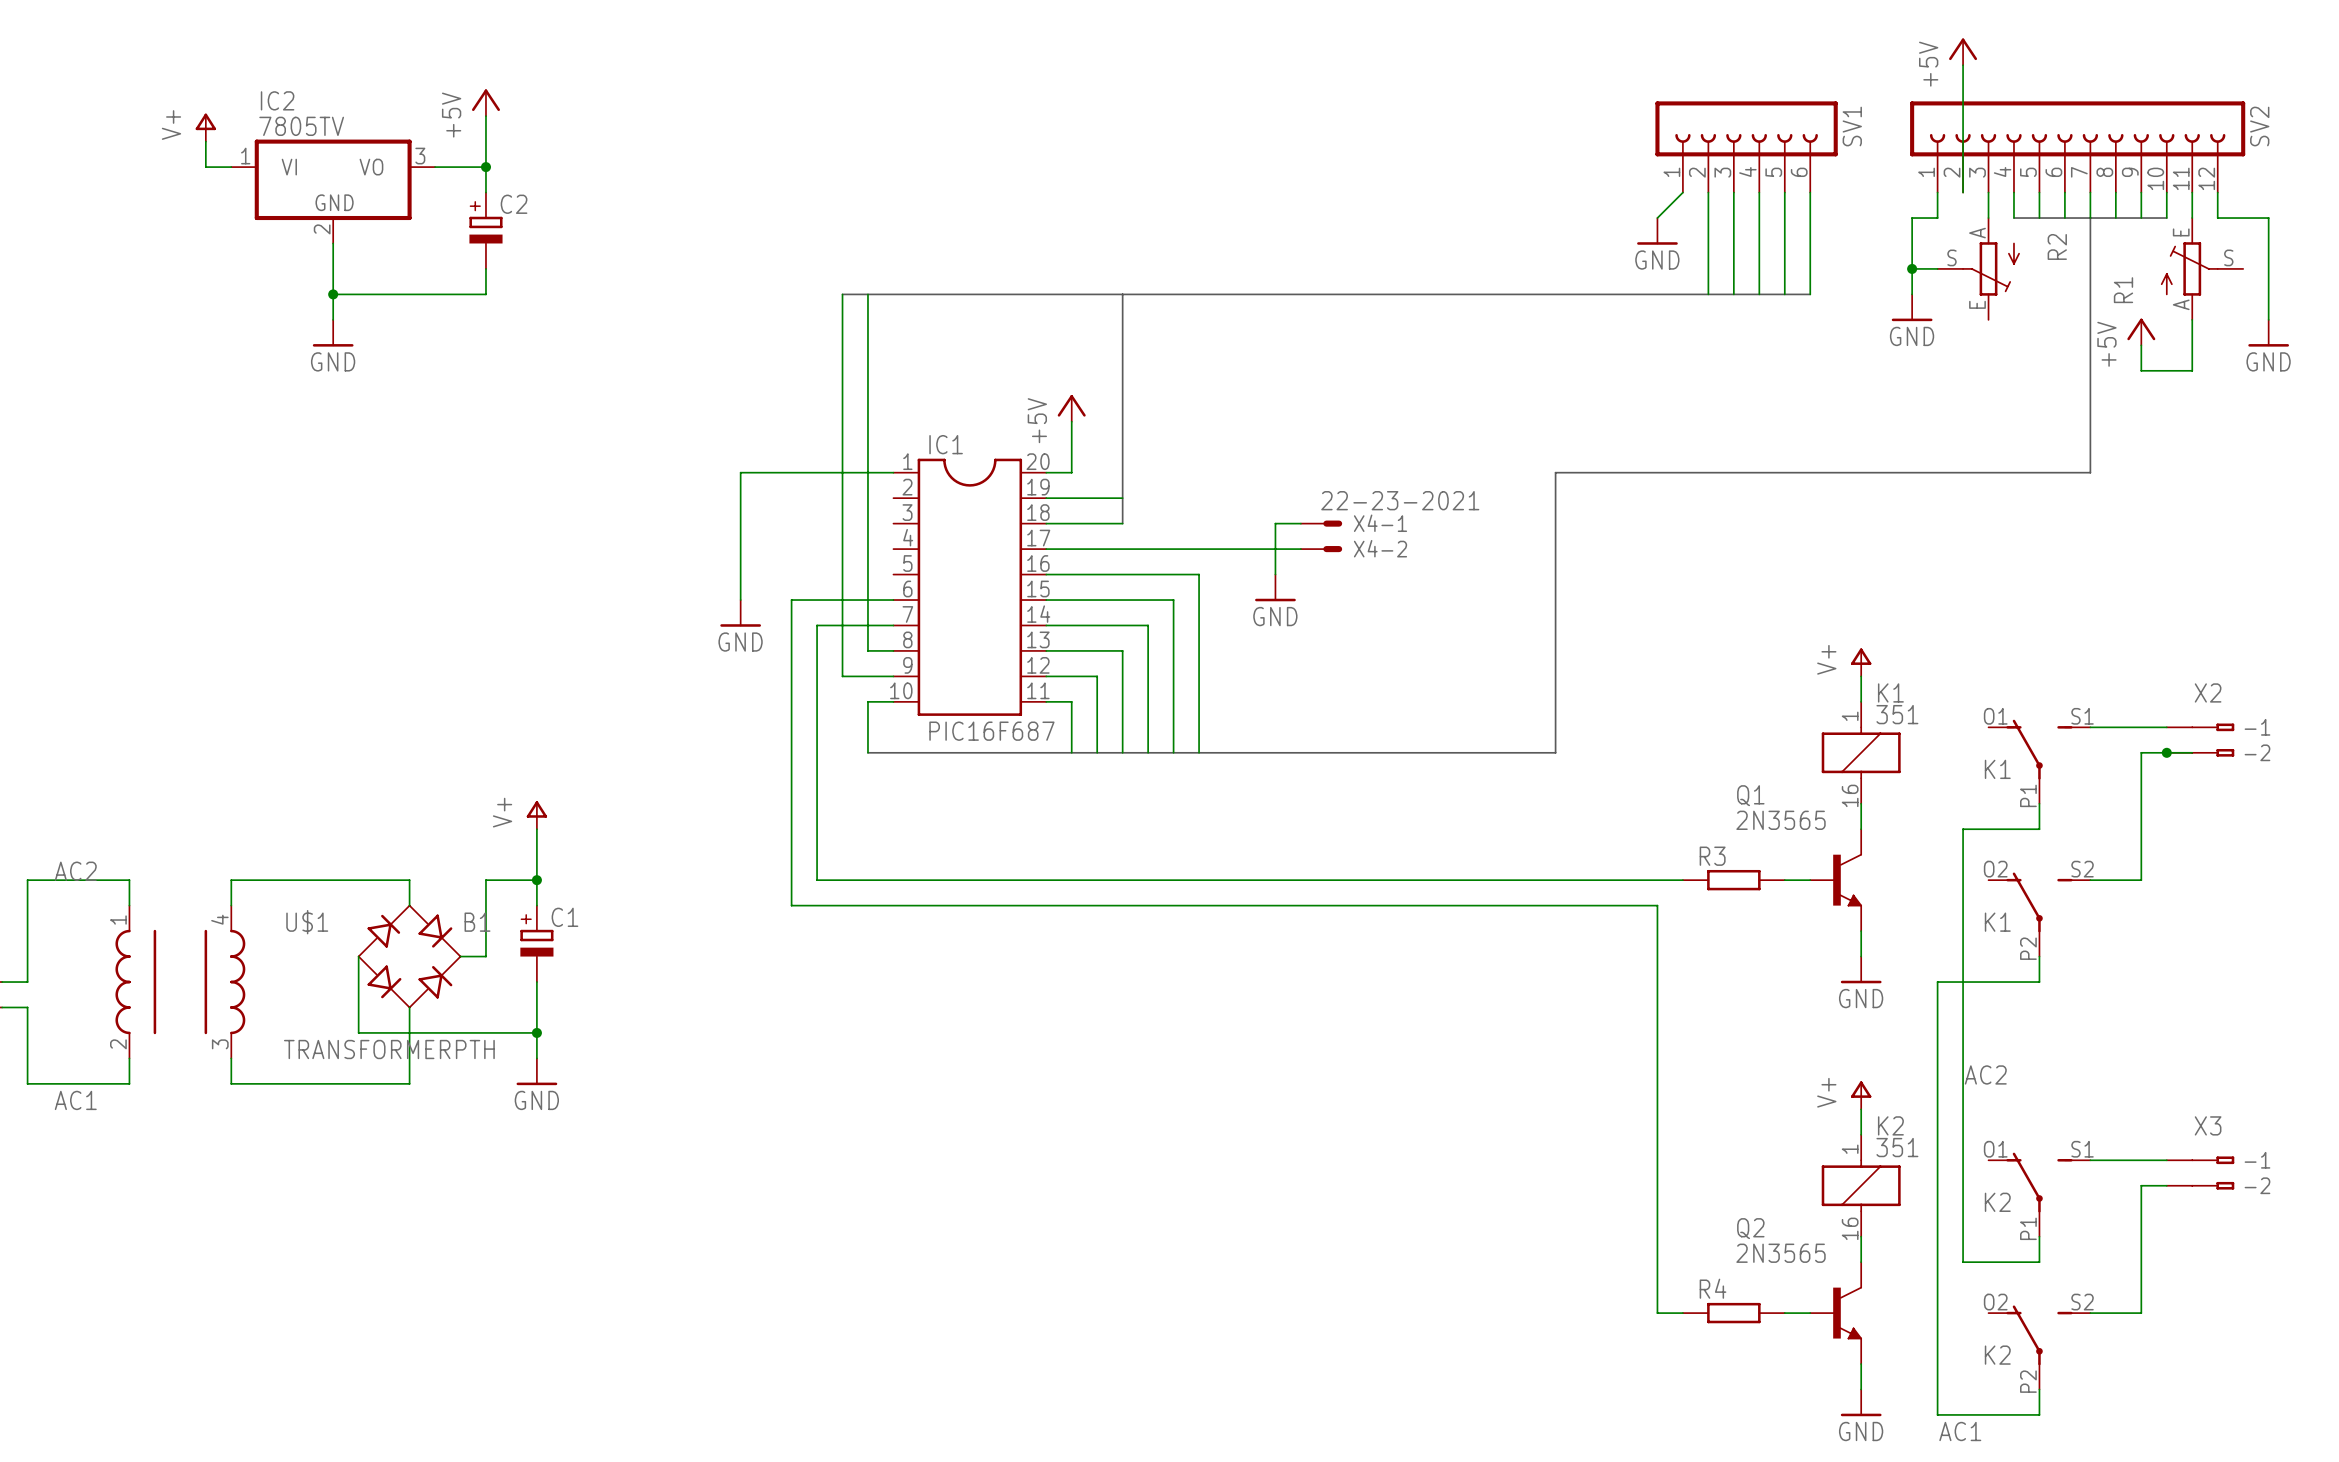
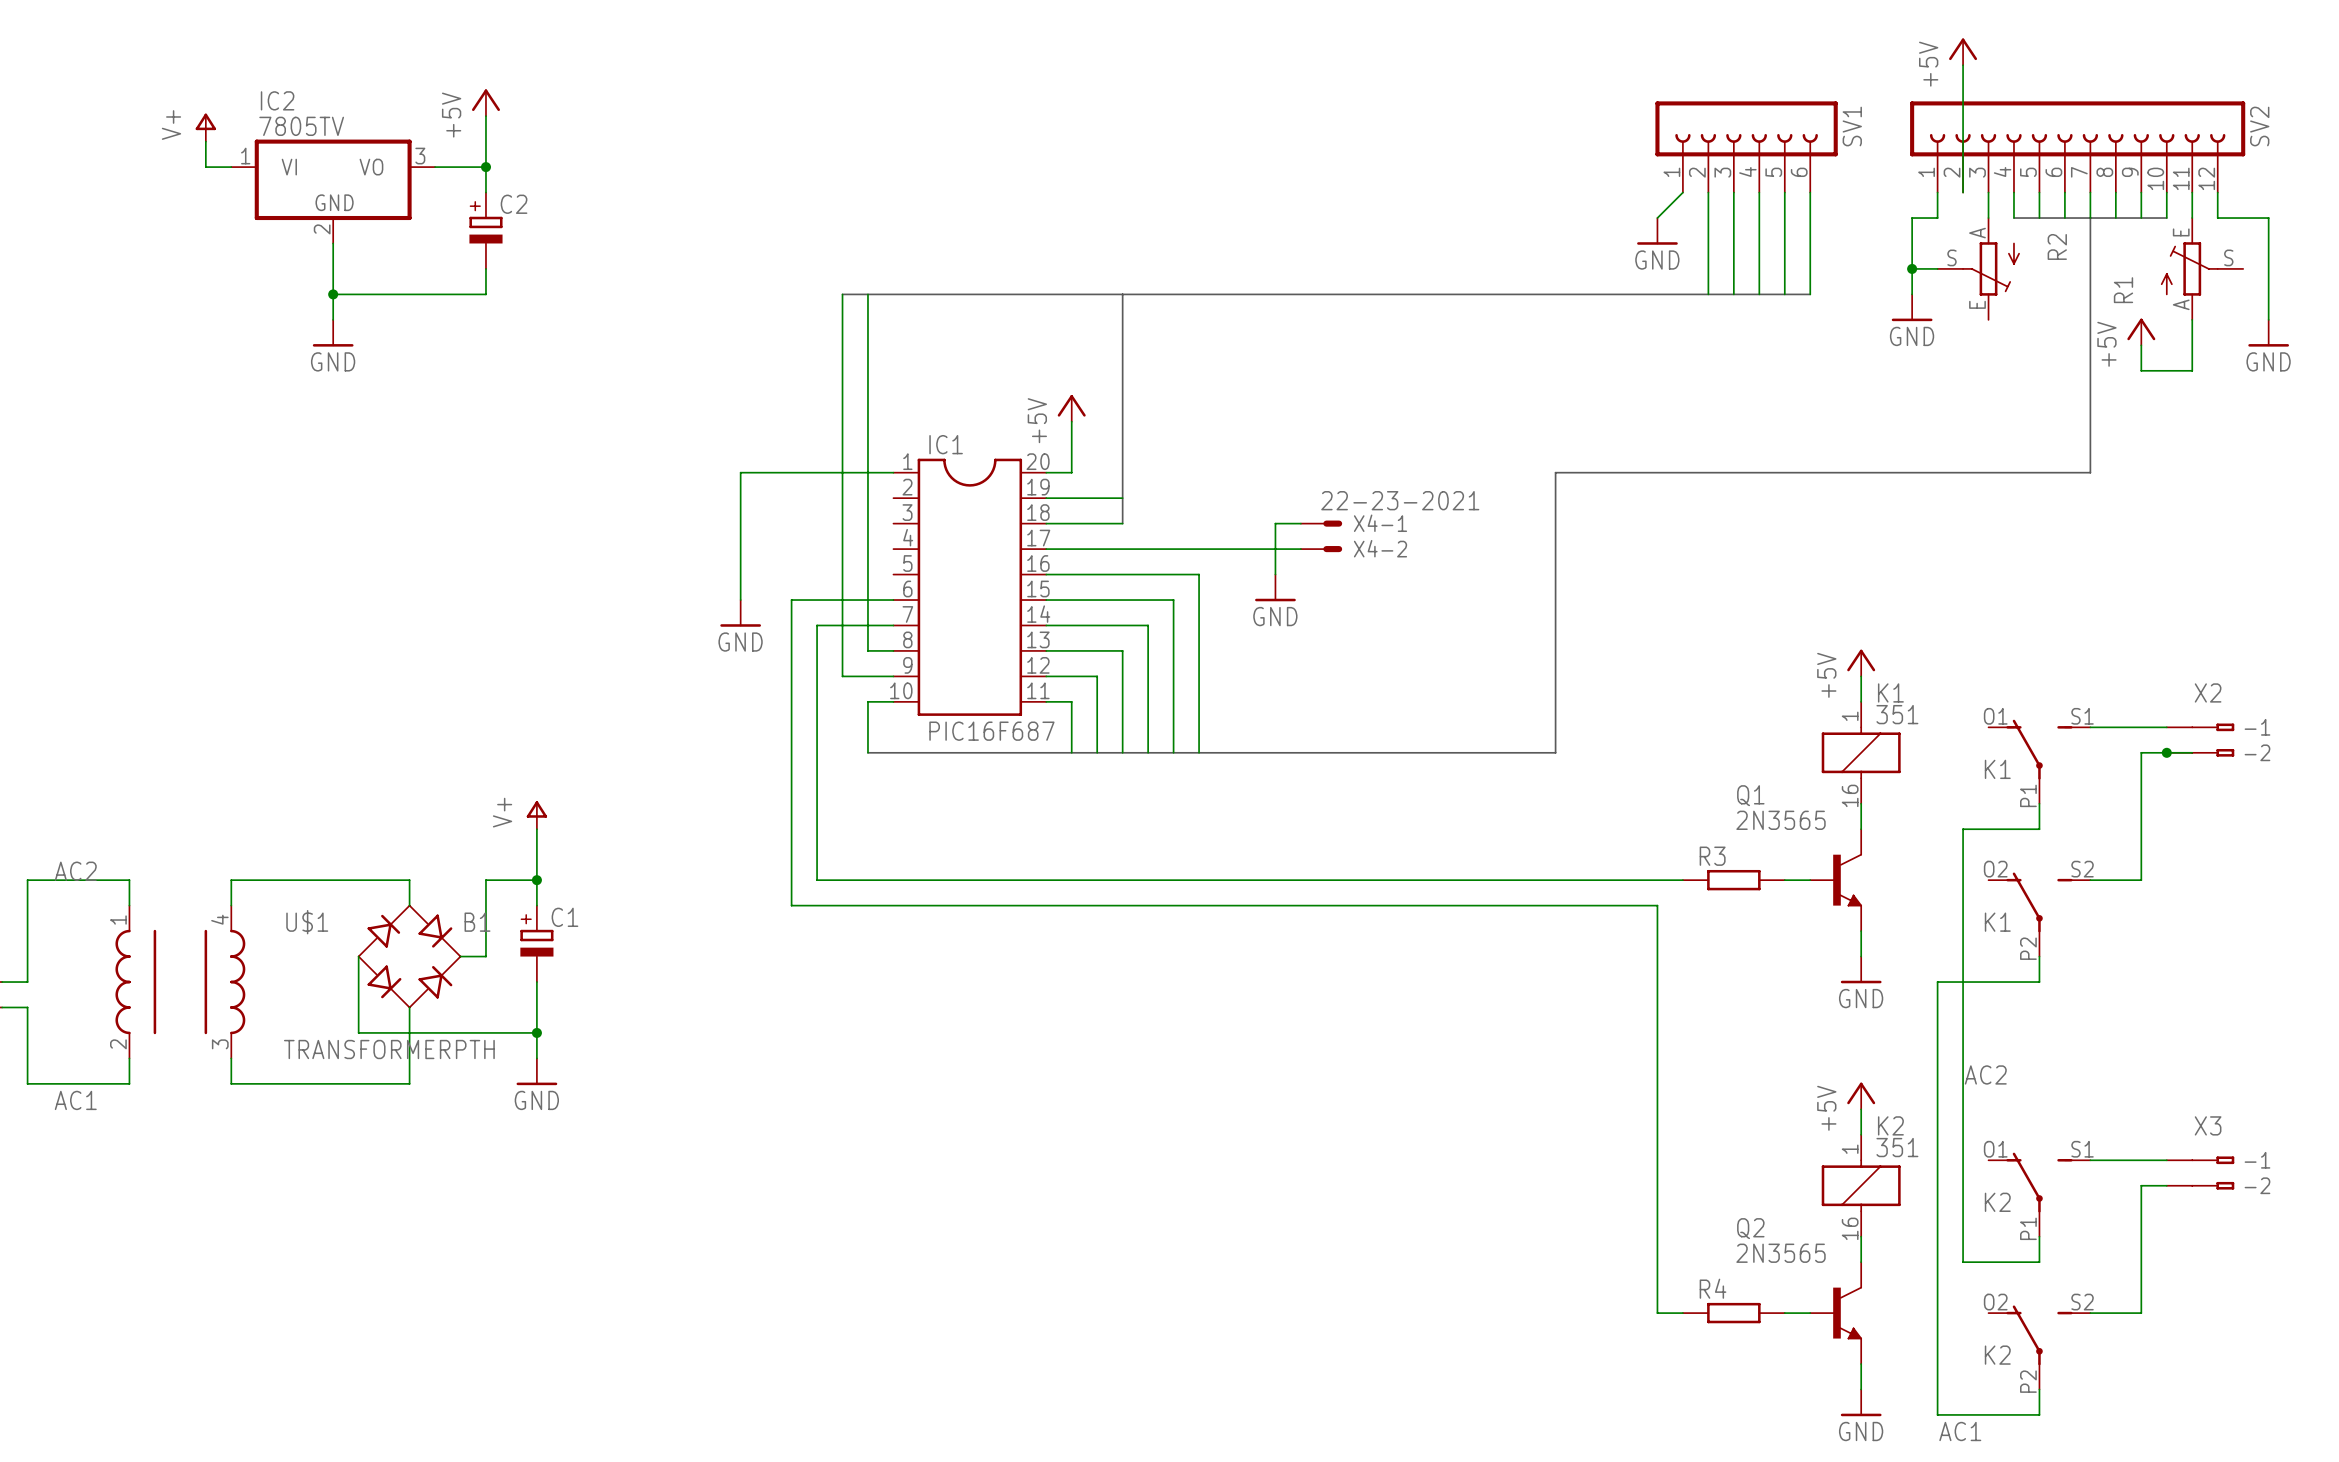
power symbol: V+ (1861, 662) -> +5V (1861, 663)
power symbol: V+ (1861, 1095) -> +5V (1861, 1095)

